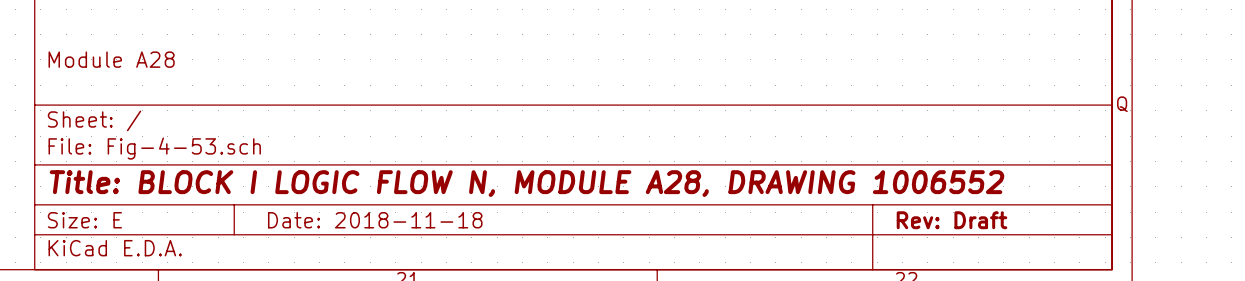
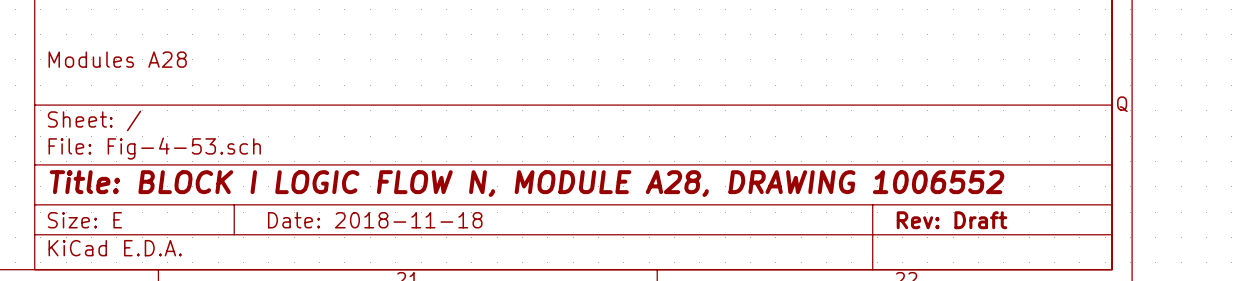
title block: Module A28 (111, 59) -> Modules A28 (117, 59)

